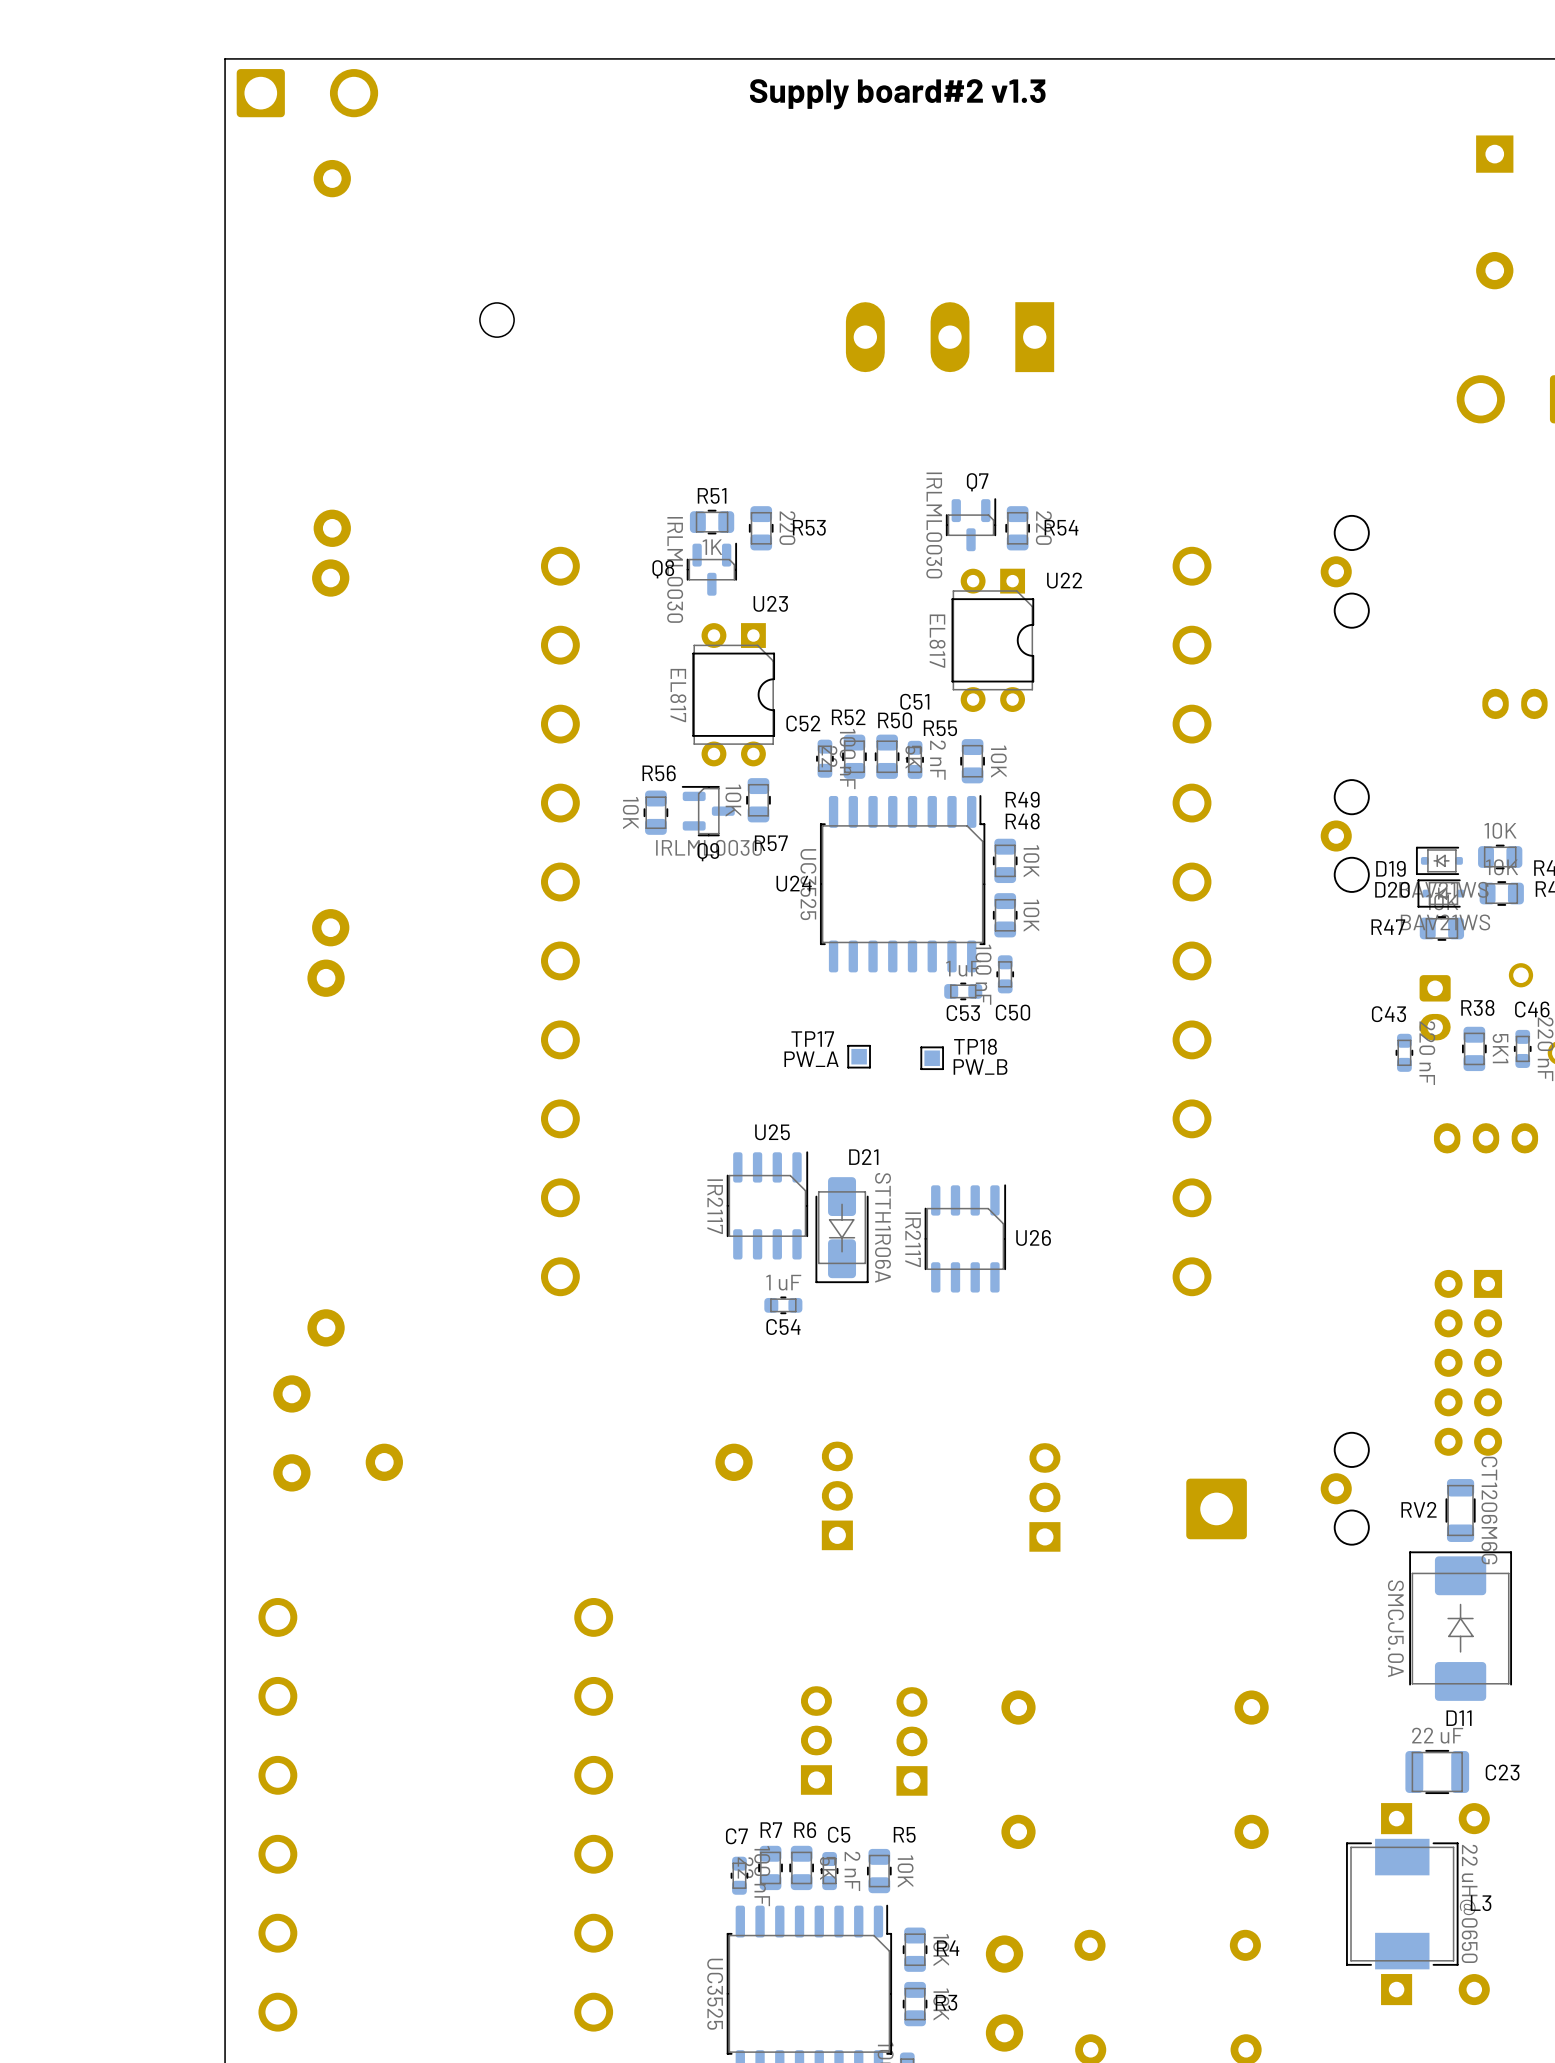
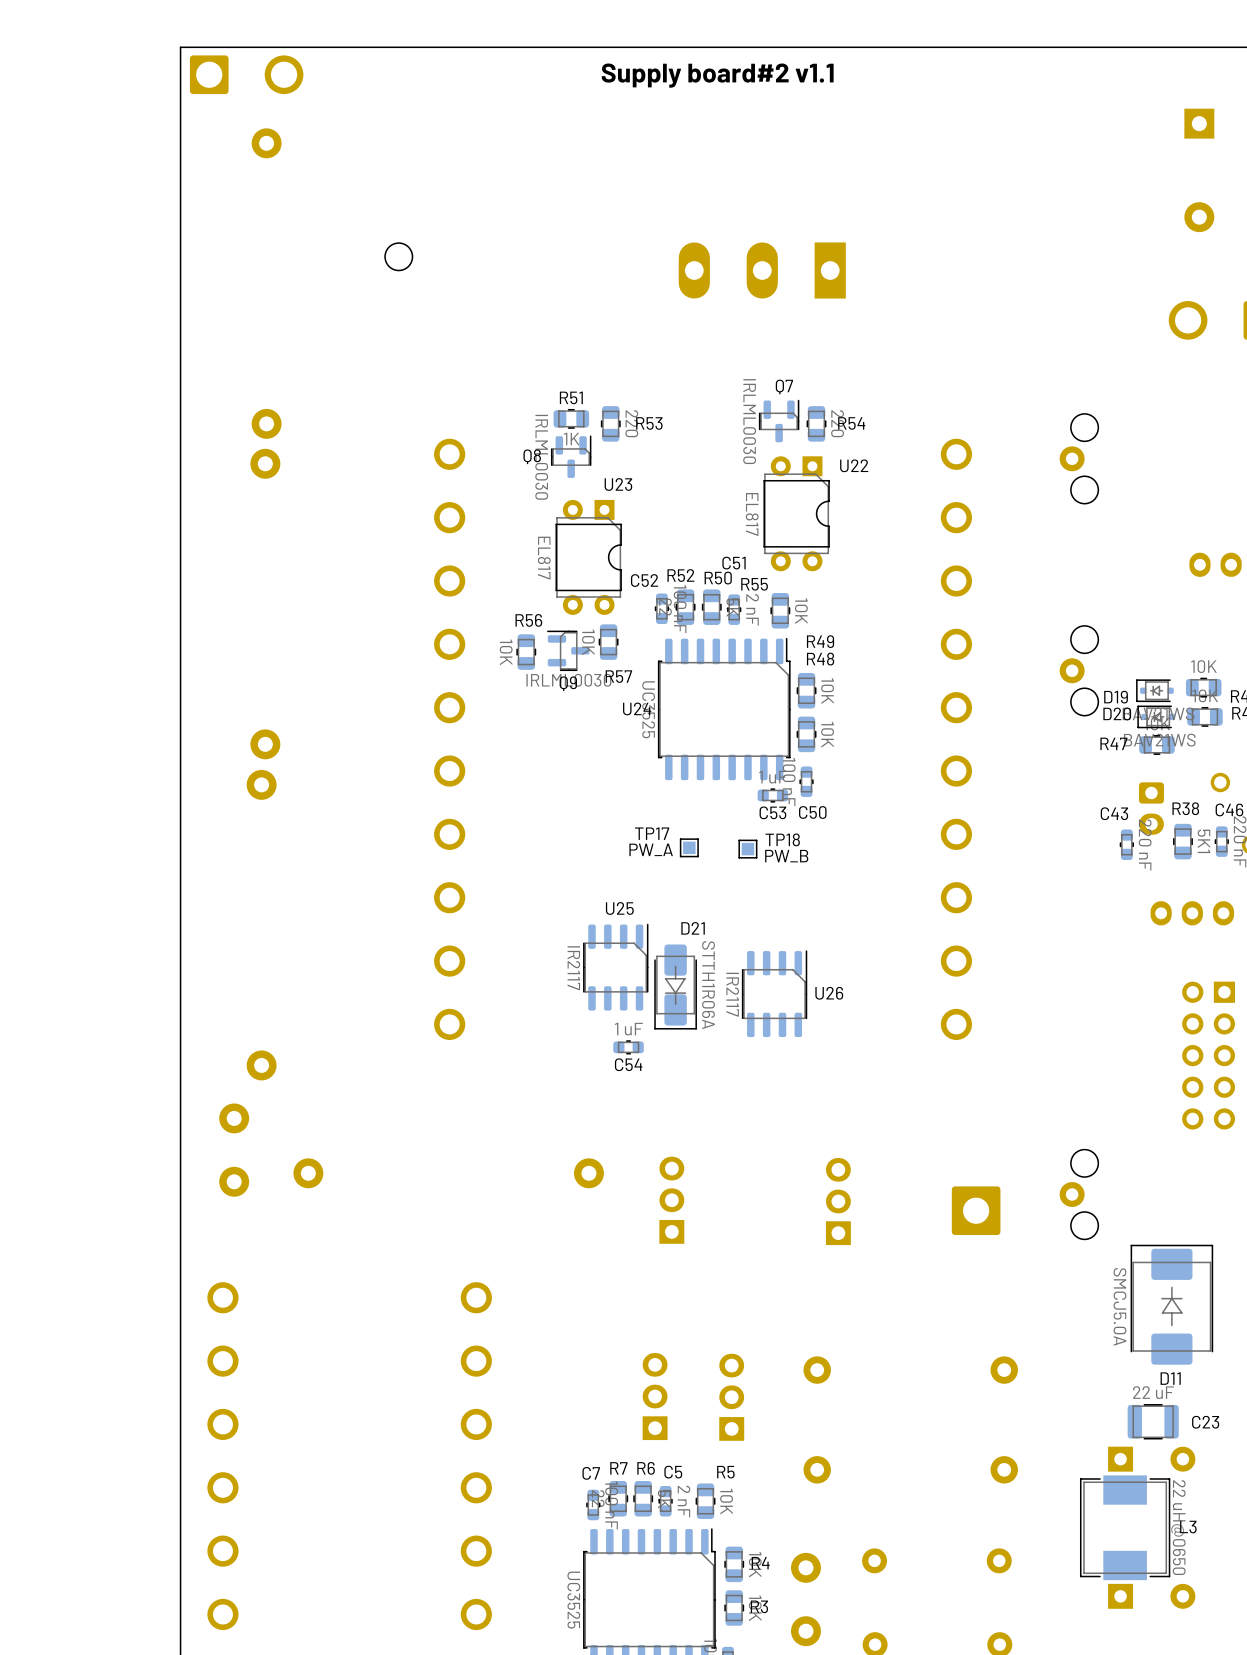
text: Supply board#2 v1.3 (897, 94) -> Supply board#2 v1.1 (717, 75)
part: none -> (1208, 1055)
part: (1468, 1362) -> none
RV2: CT1206M6G (1460, 1510) -> none

